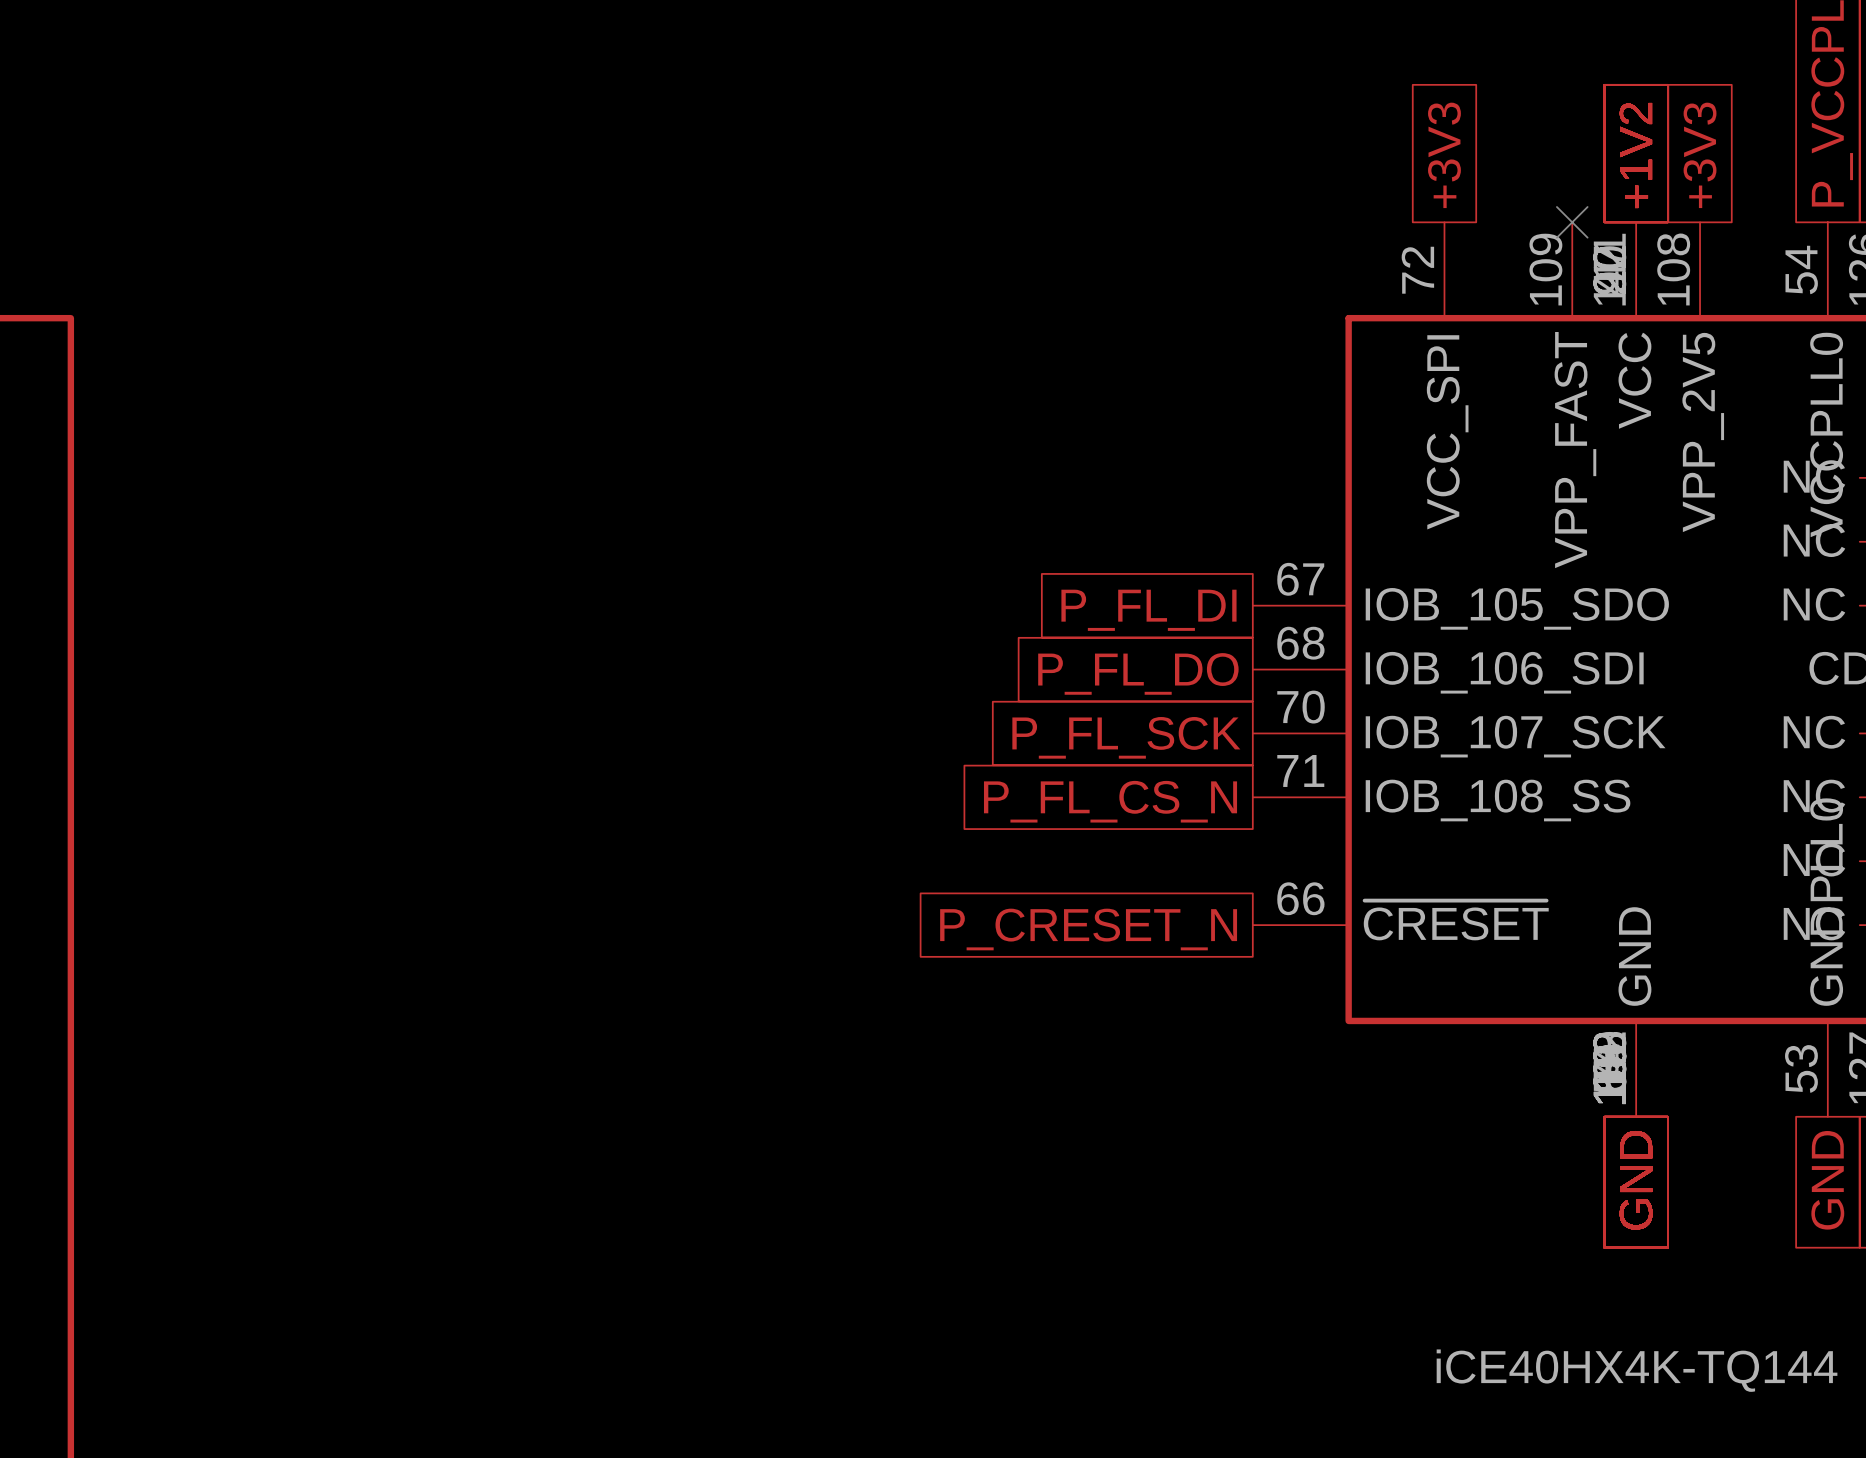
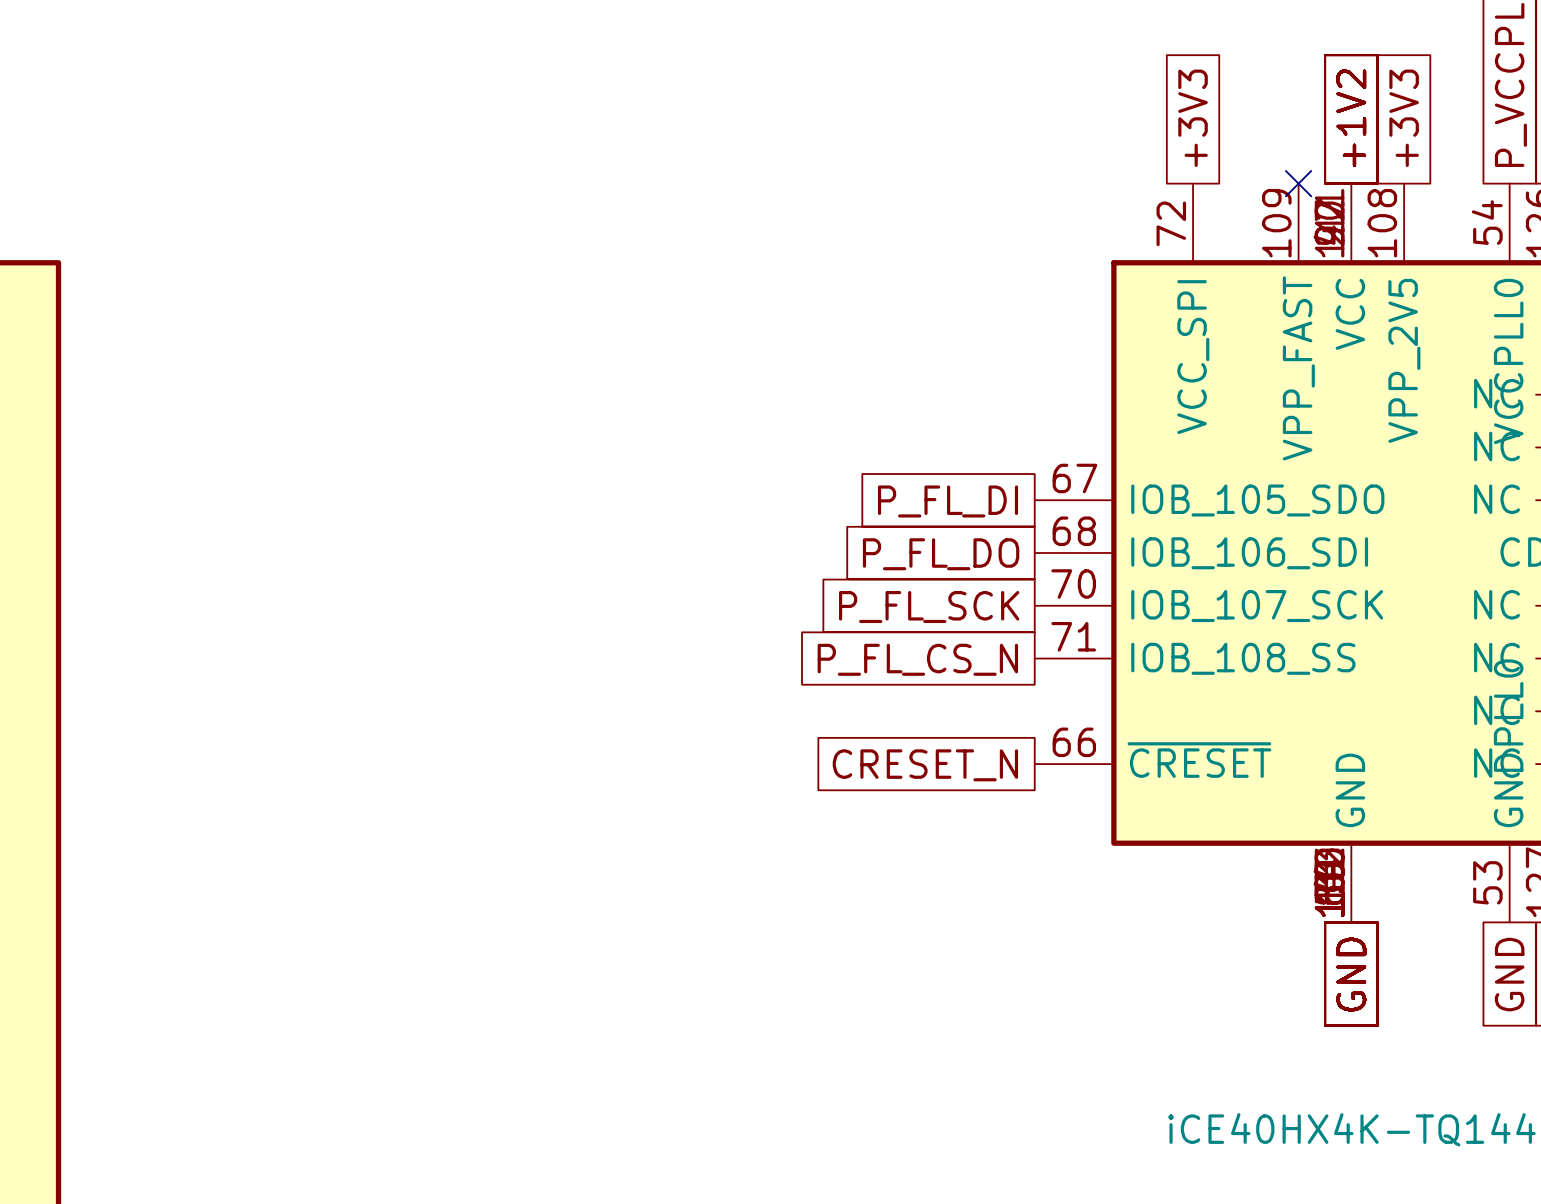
global label: P_CRESET_N (1088, 929) -> CRESET_N (925, 765)

